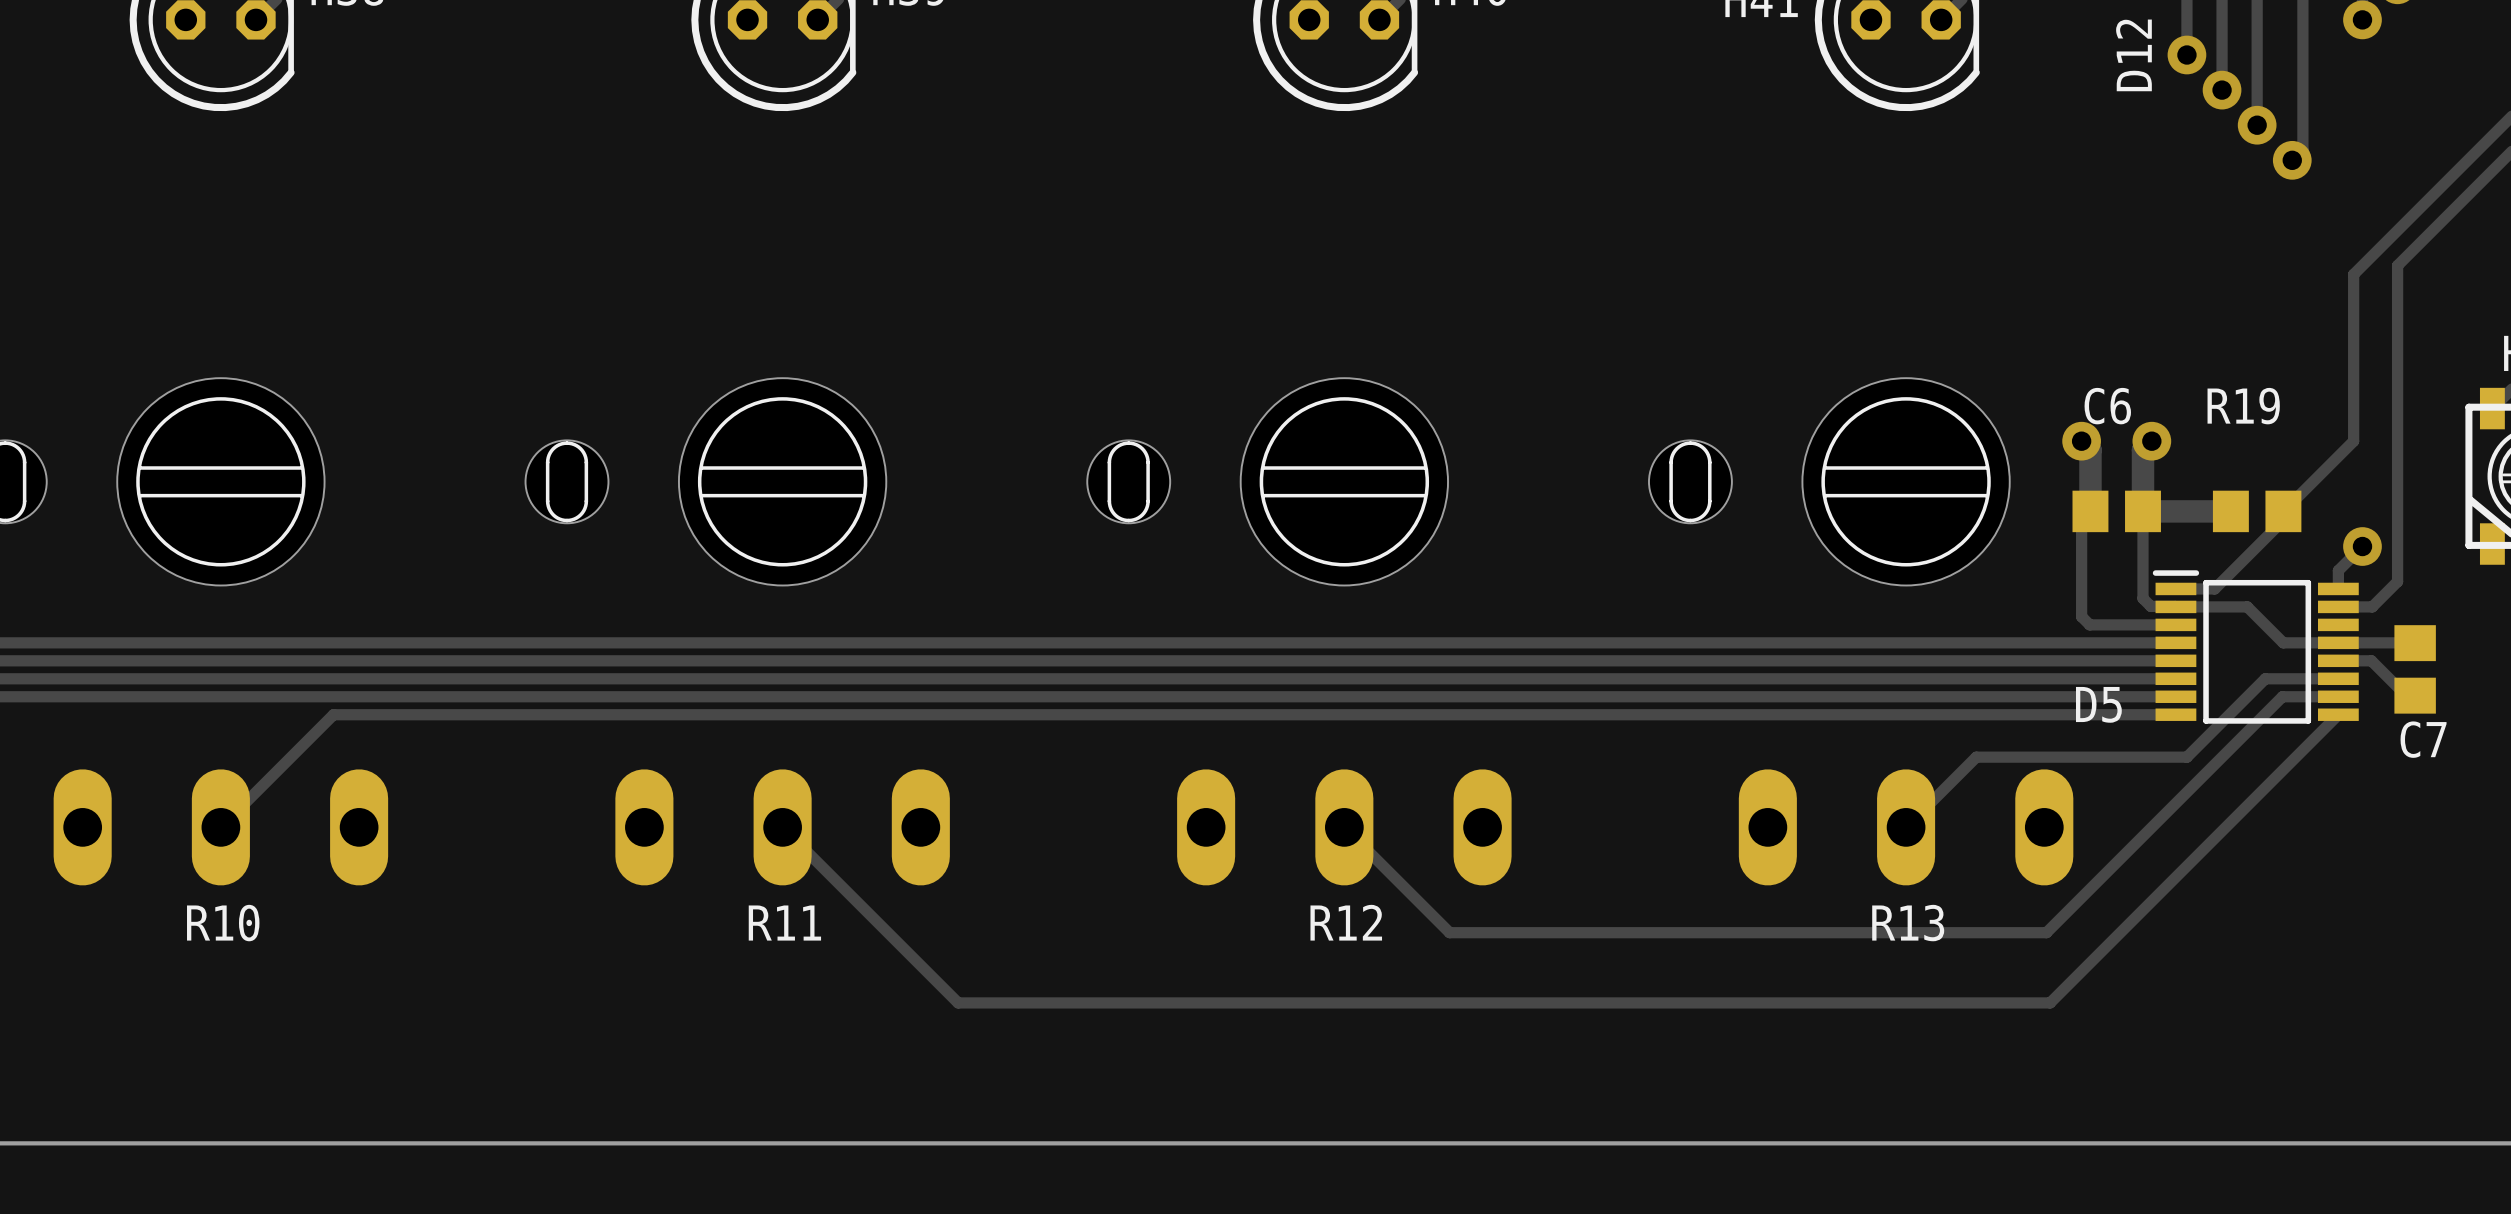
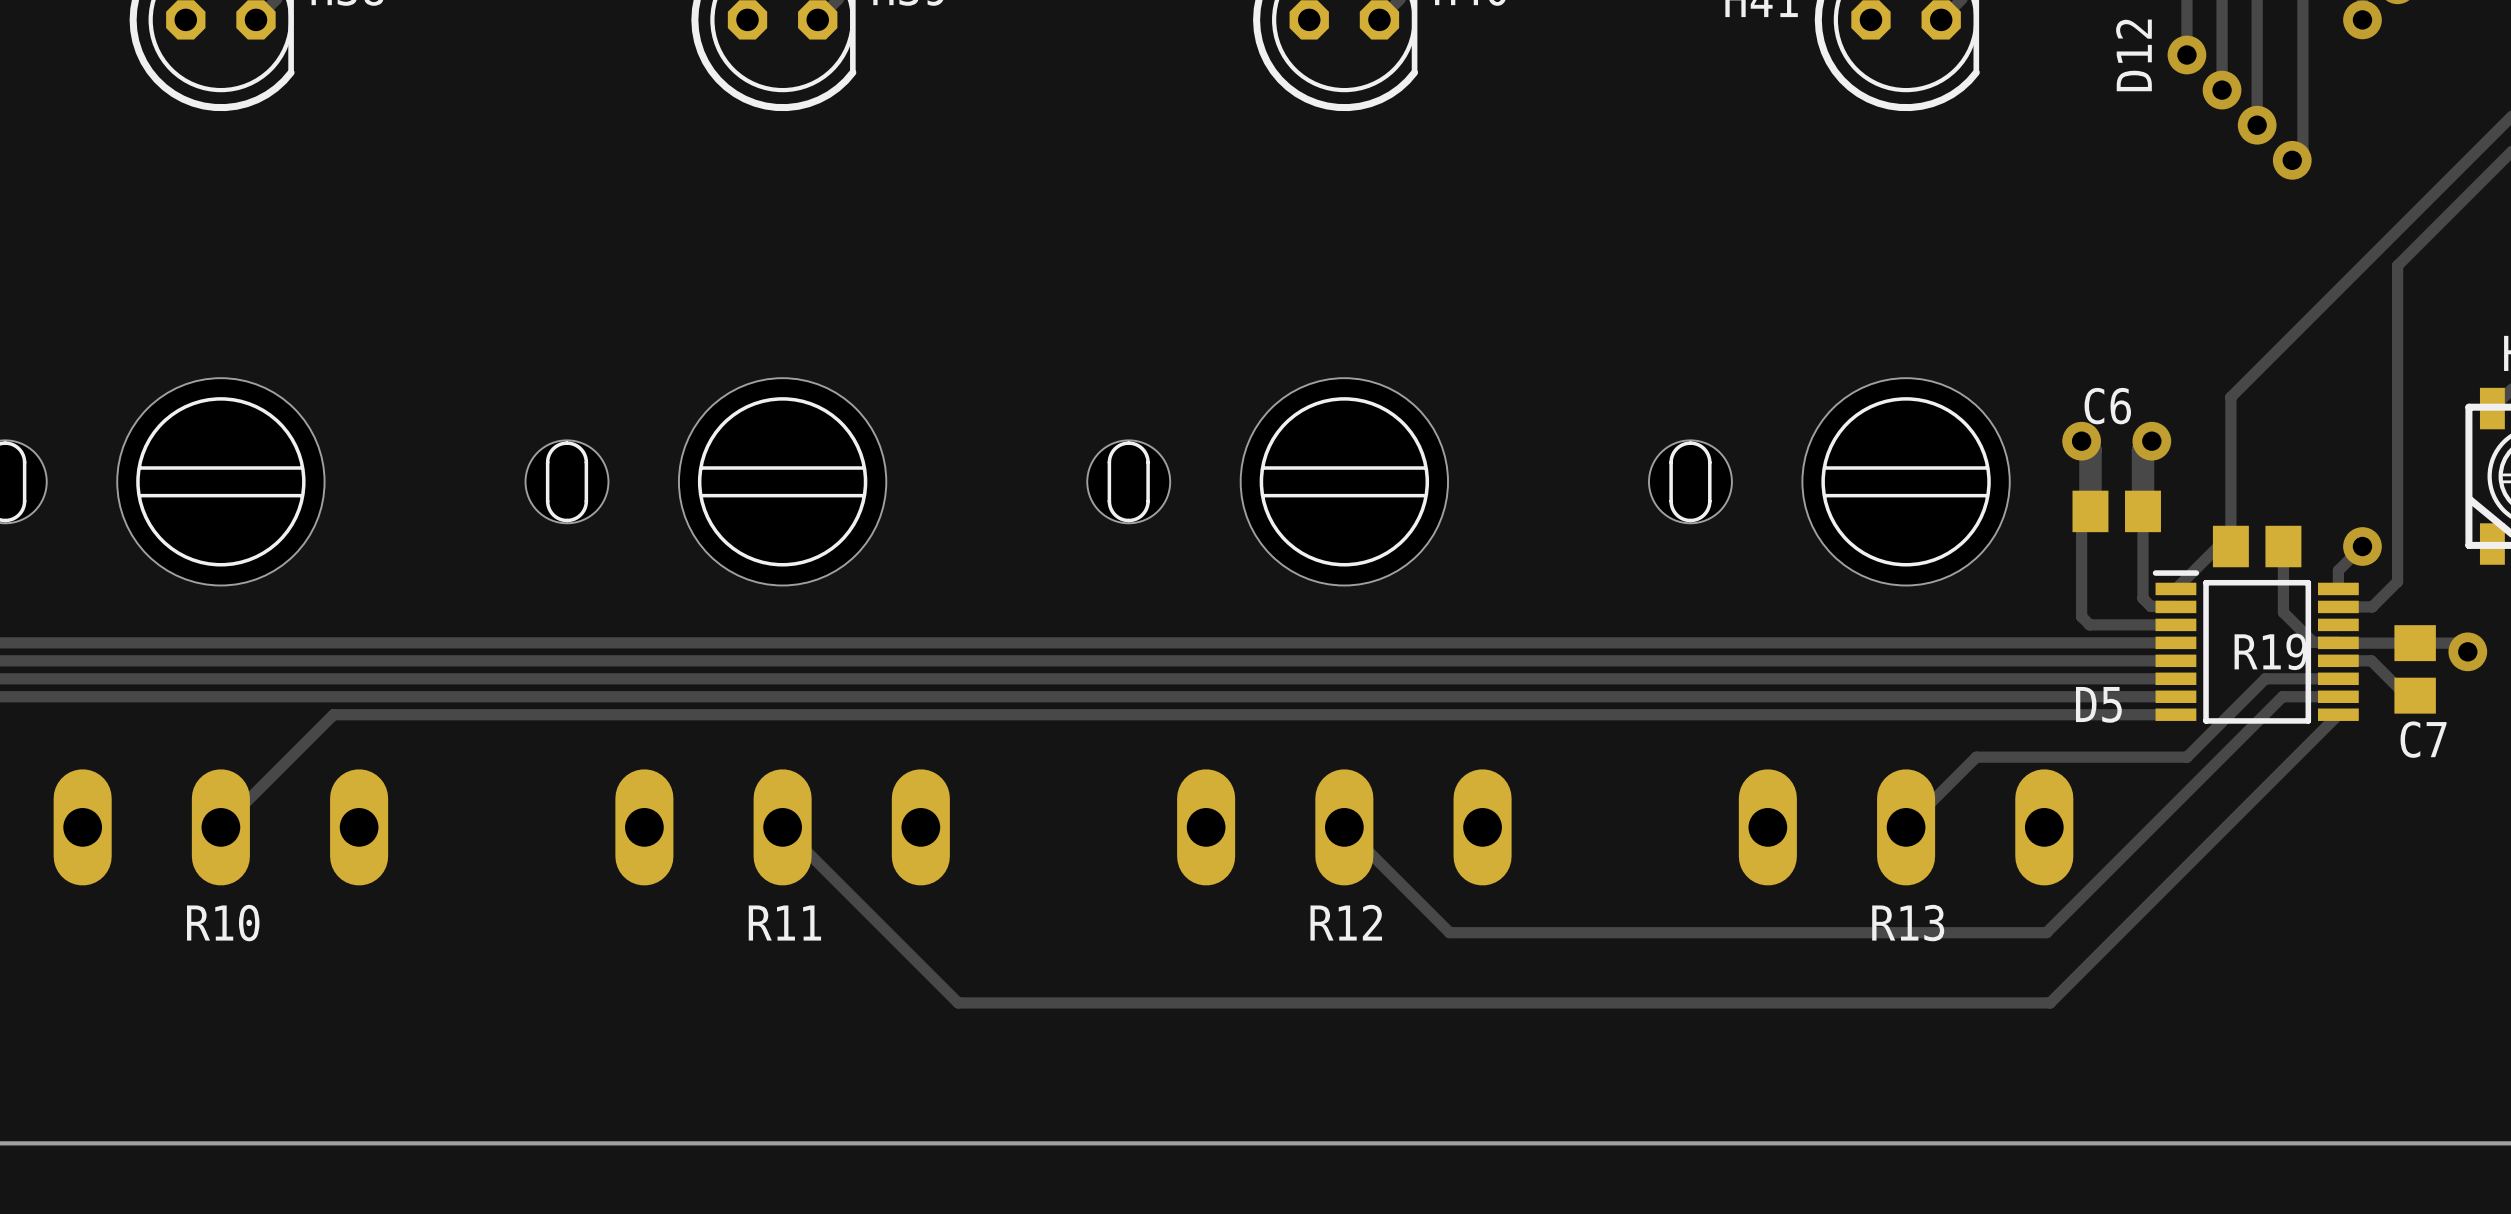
track: (2353, 274) (2353, 441) (2283, 511) (2283, 520) (2214, 588) (2175, 588) -> (2353, 274) (2230, 397) (2230, 546) (2218, 546) (2175, 588)
R19 name position: R19 (2243, 406) -> R19 (2270, 651)
track: (2142, 511) (2230, 511) -> none
R19 position: (2257, 511) -> (2257, 546)
track: none -> (2283, 546) (2283, 612) (2313, 642) (2459, 643) (2467, 651)
track: (2175, 606) (2247, 606) (2283, 642) (2414, 642) -> none
via: none -> (2467, 651)

